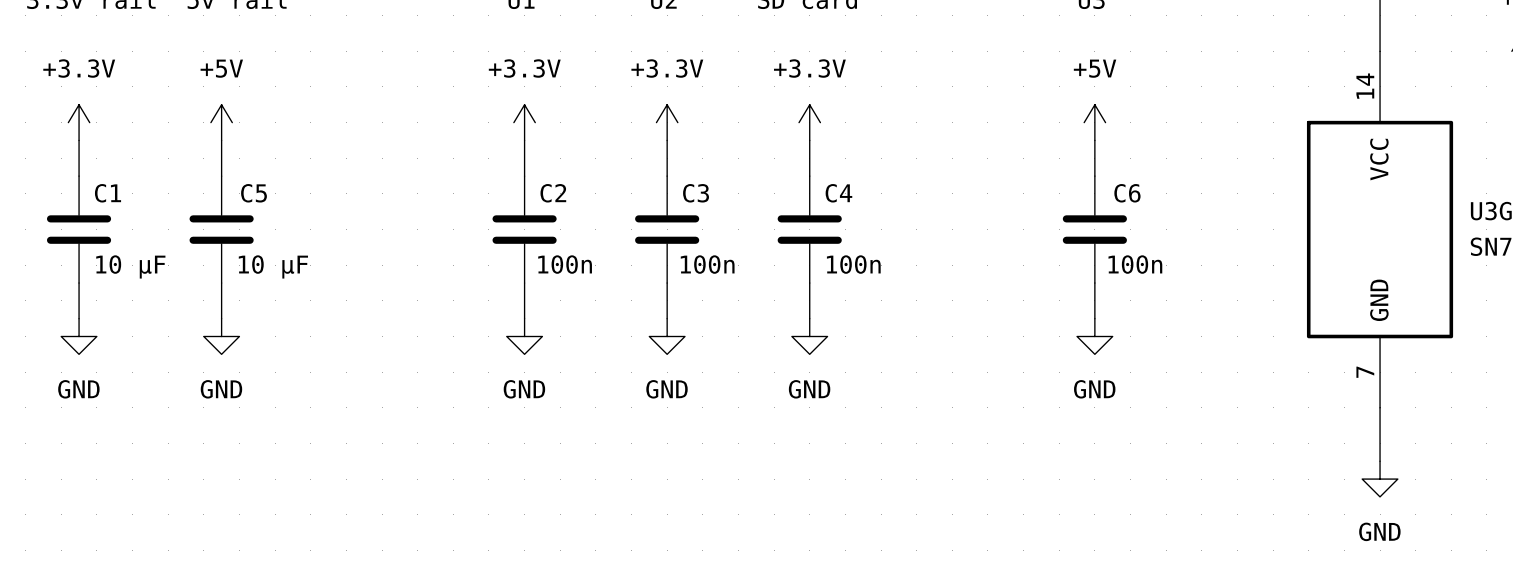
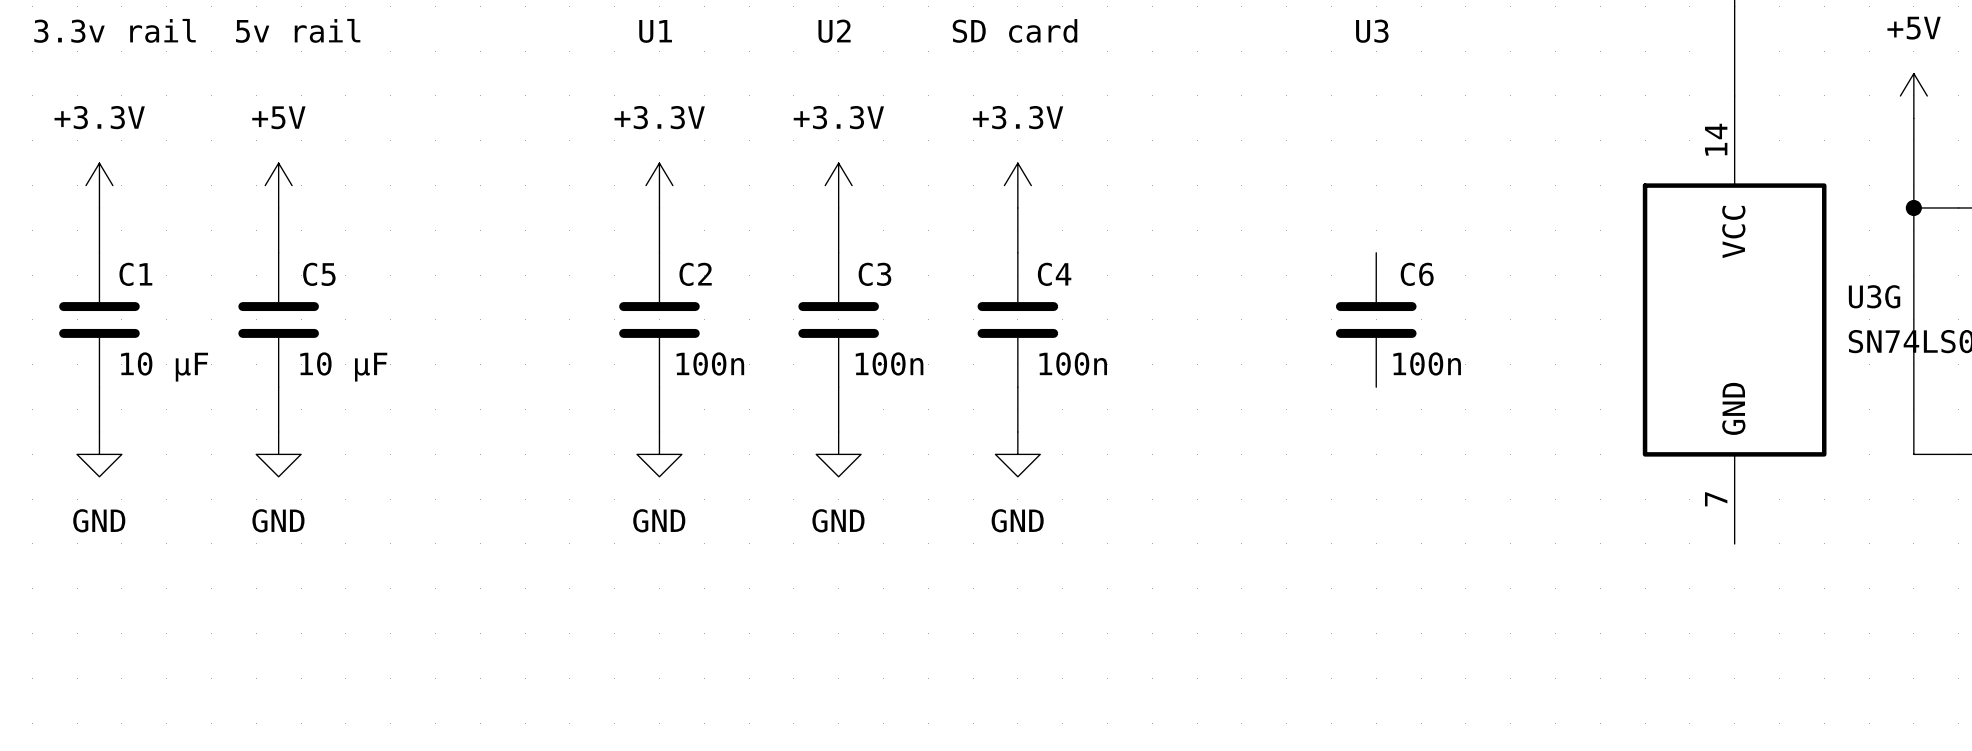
power symbol: +5V (1094, 122) -> none
wire: (1094, 140) (1094, 176) -> none
wire: (1094, 283) (1094, 318) -> none
power symbol: GND (1094, 336) -> none
wire: (1380, 407) (1380, 461) -> none
power symbol: GND (1380, 479) -> none

